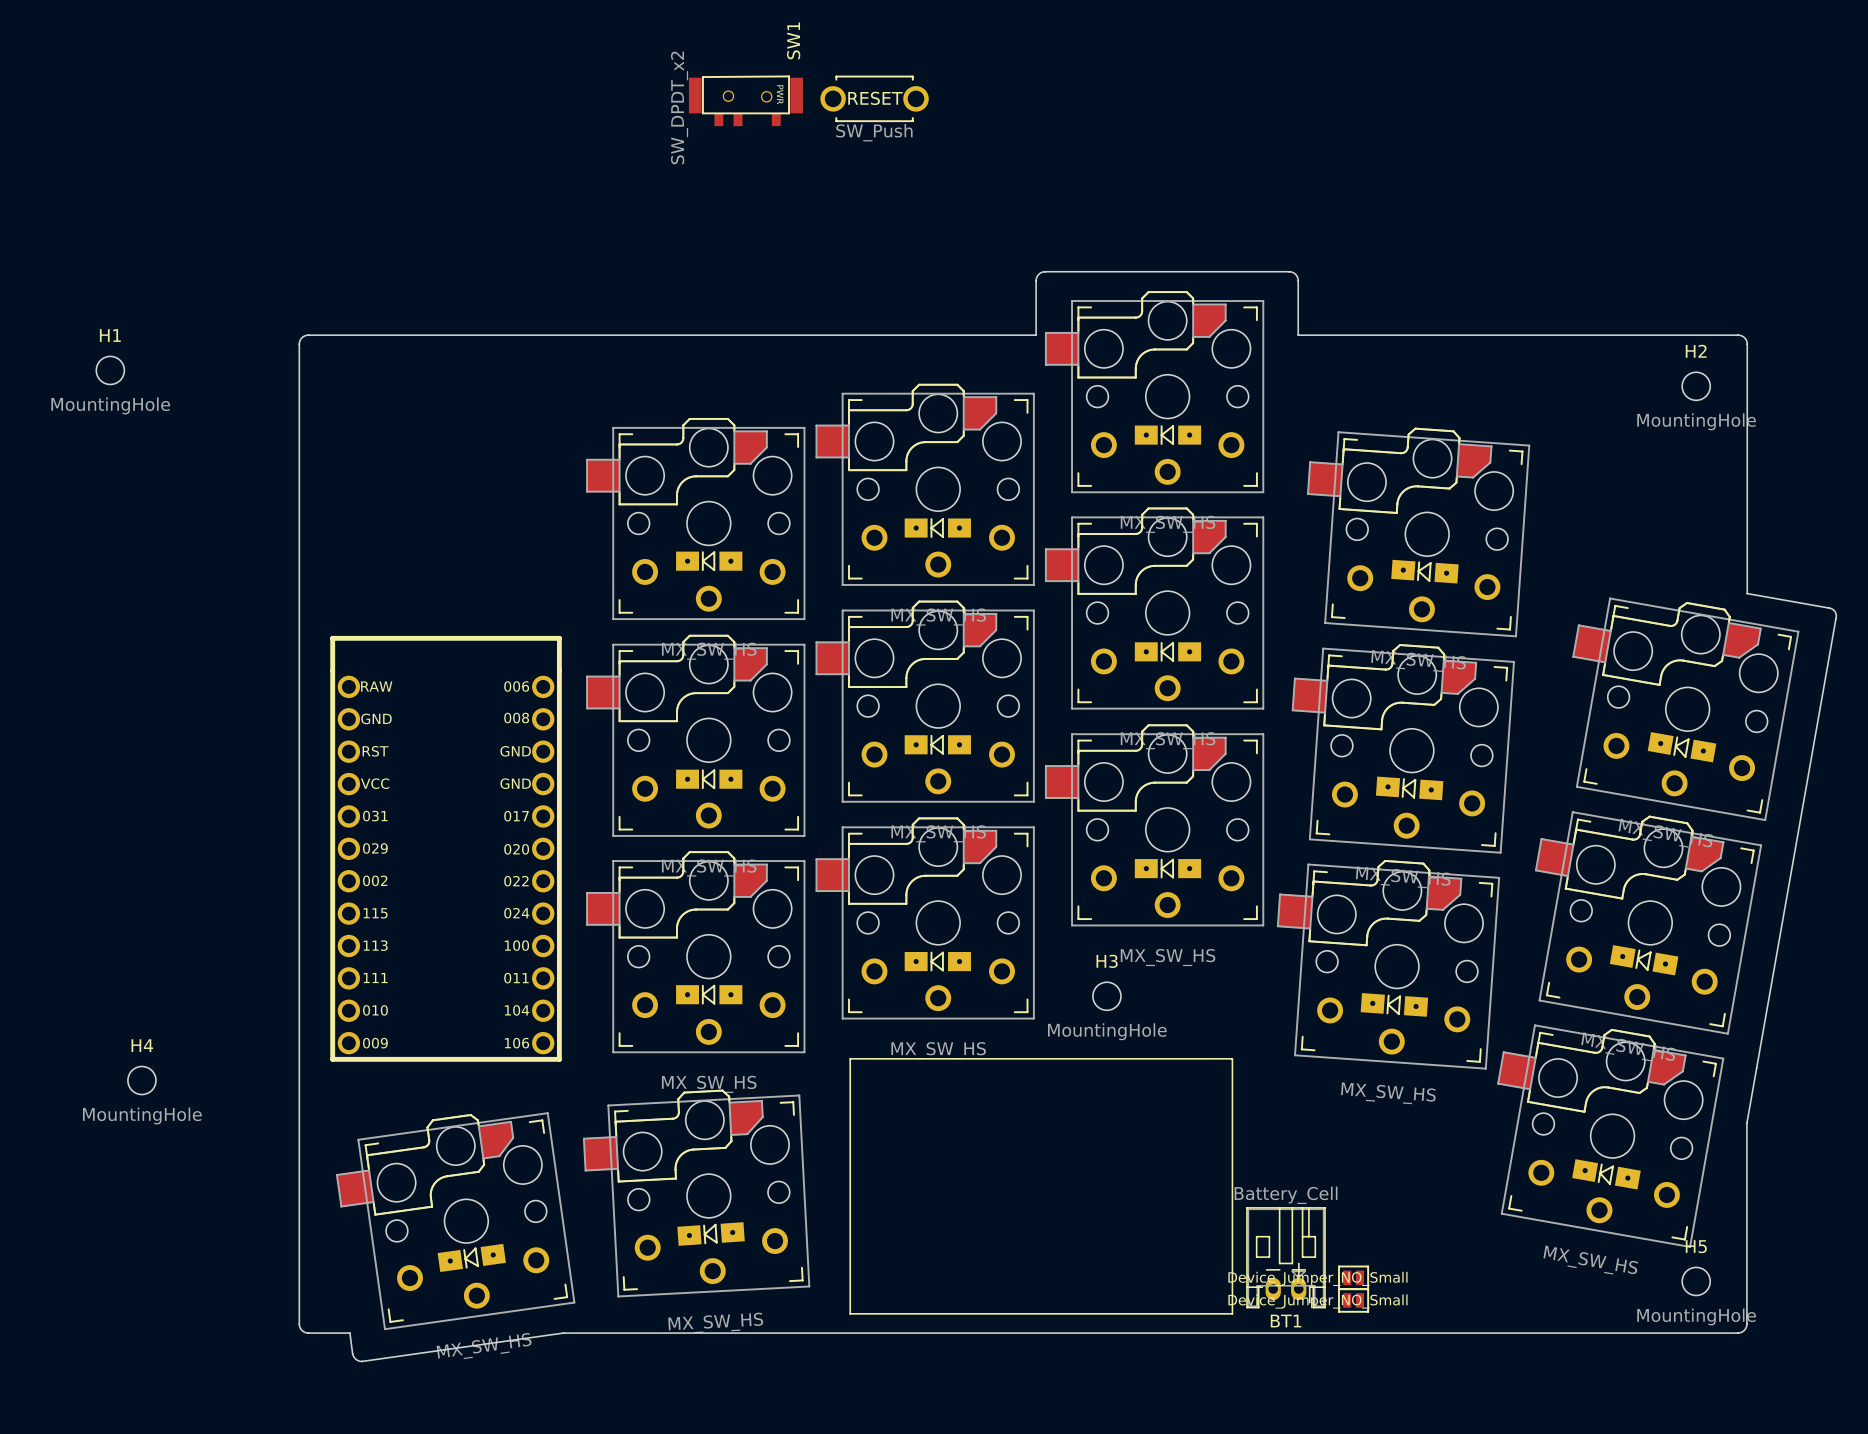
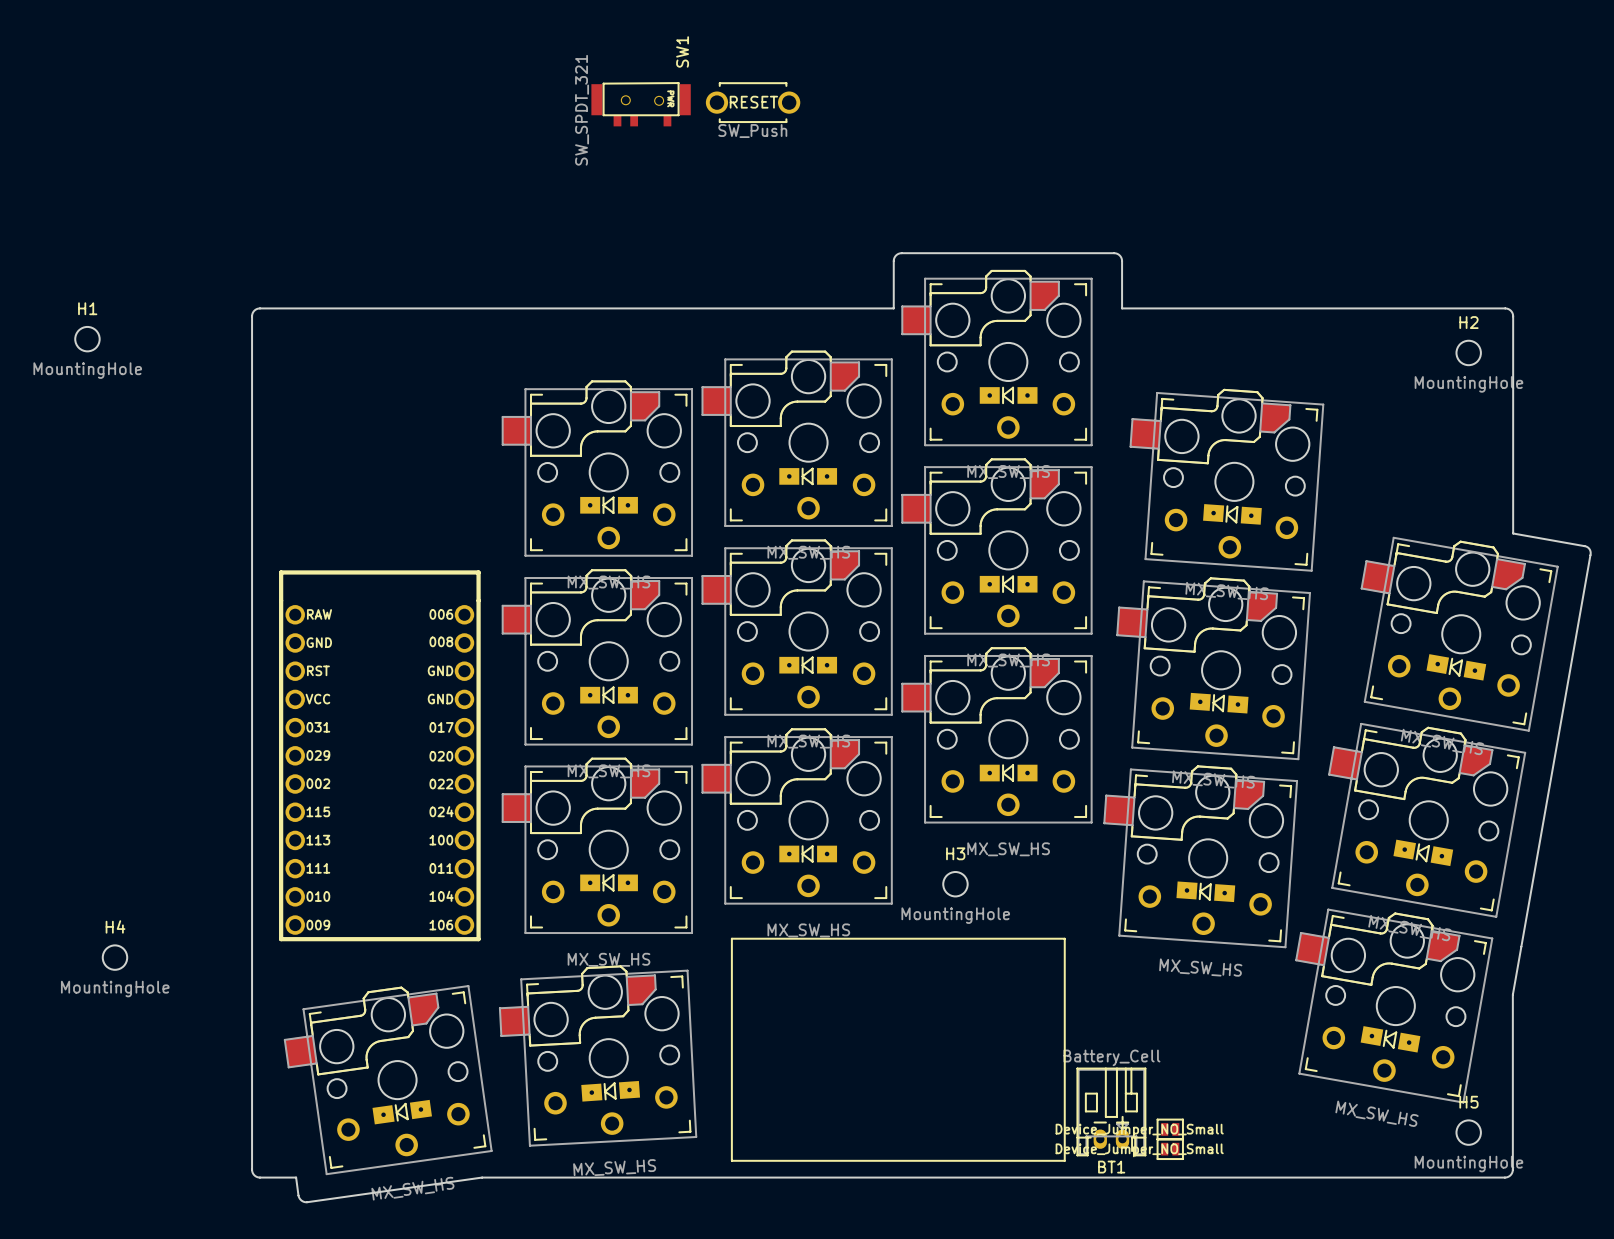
SW1 value: SW_DPDT_x2 (679, 107) -> SW_SPDT_321 (582, 110)

